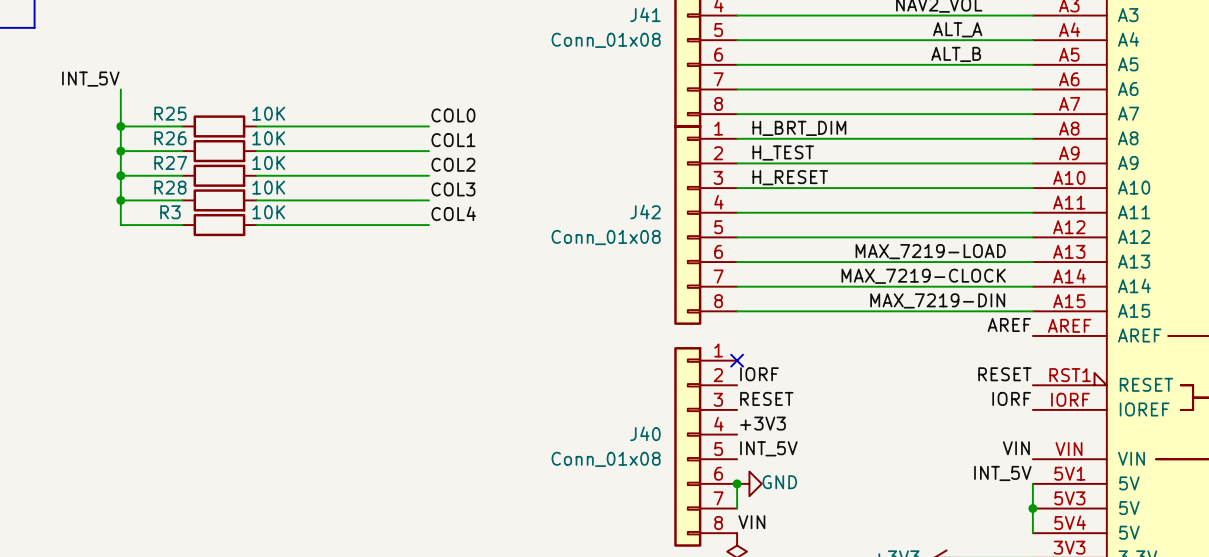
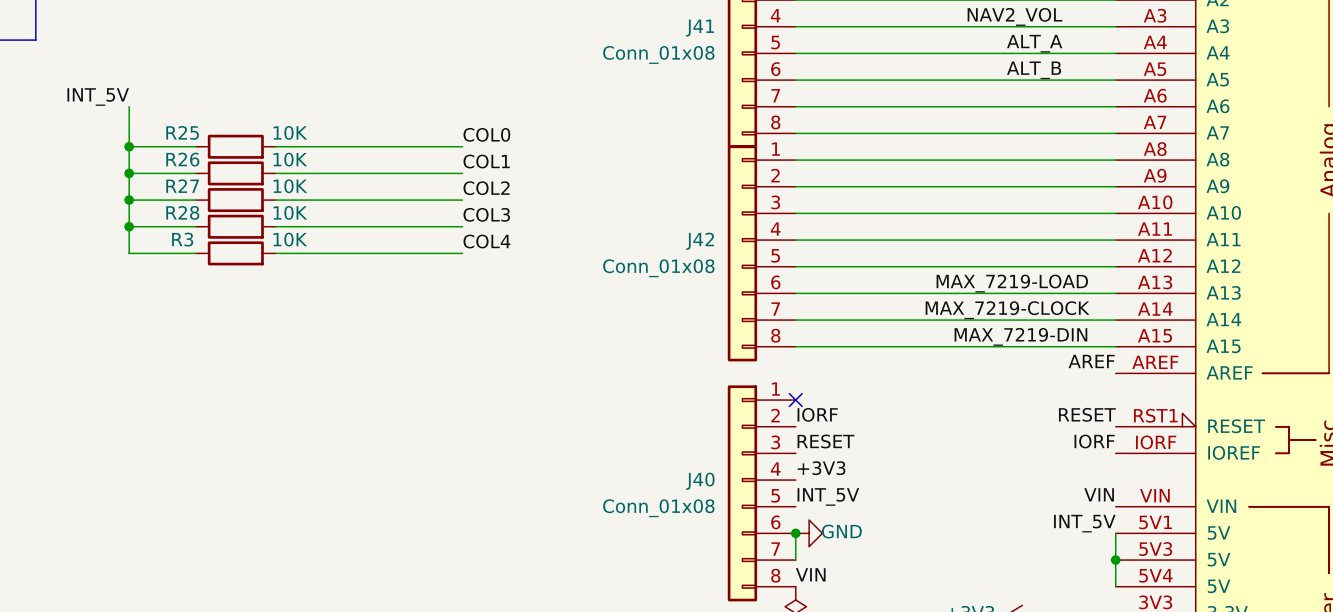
label: H_BRT_DIM (799, 128) -> none
label: H_TEST (783, 153) -> none
label: H_RESET (790, 177) -> none

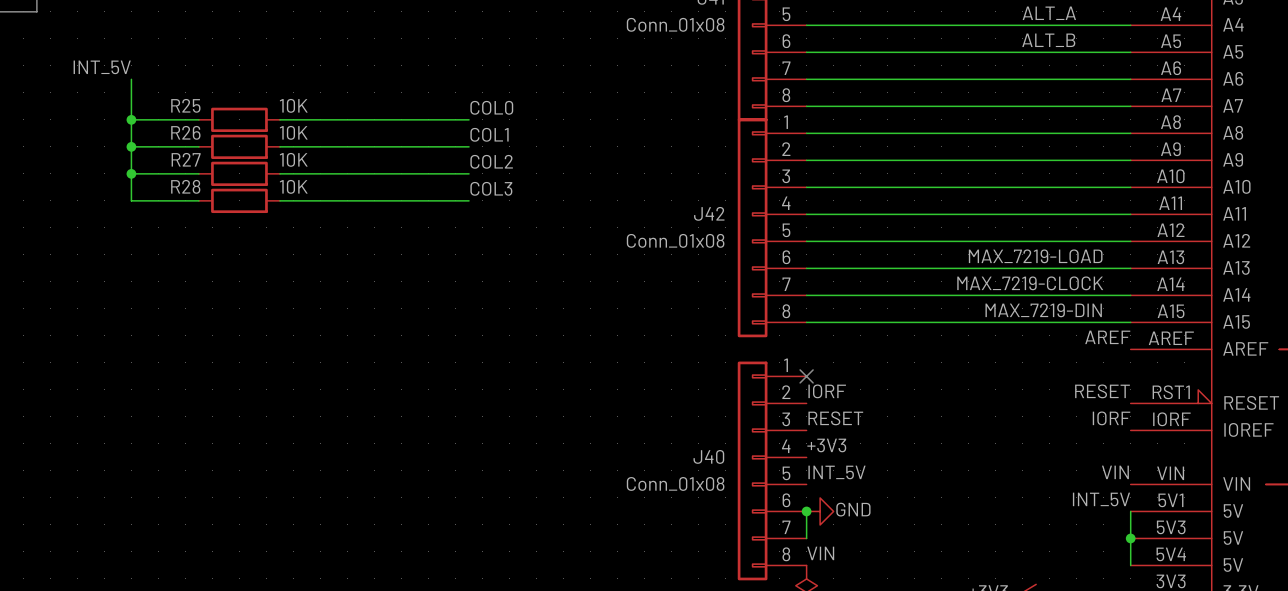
wire: (129, 226) (129, 253) (195, 253) -> none
junction: (129, 226) -> none
label: COL4 (486, 241) -> none
R3: 10K (235, 253) -> none
wire: (275, 253) (462, 253) -> none

